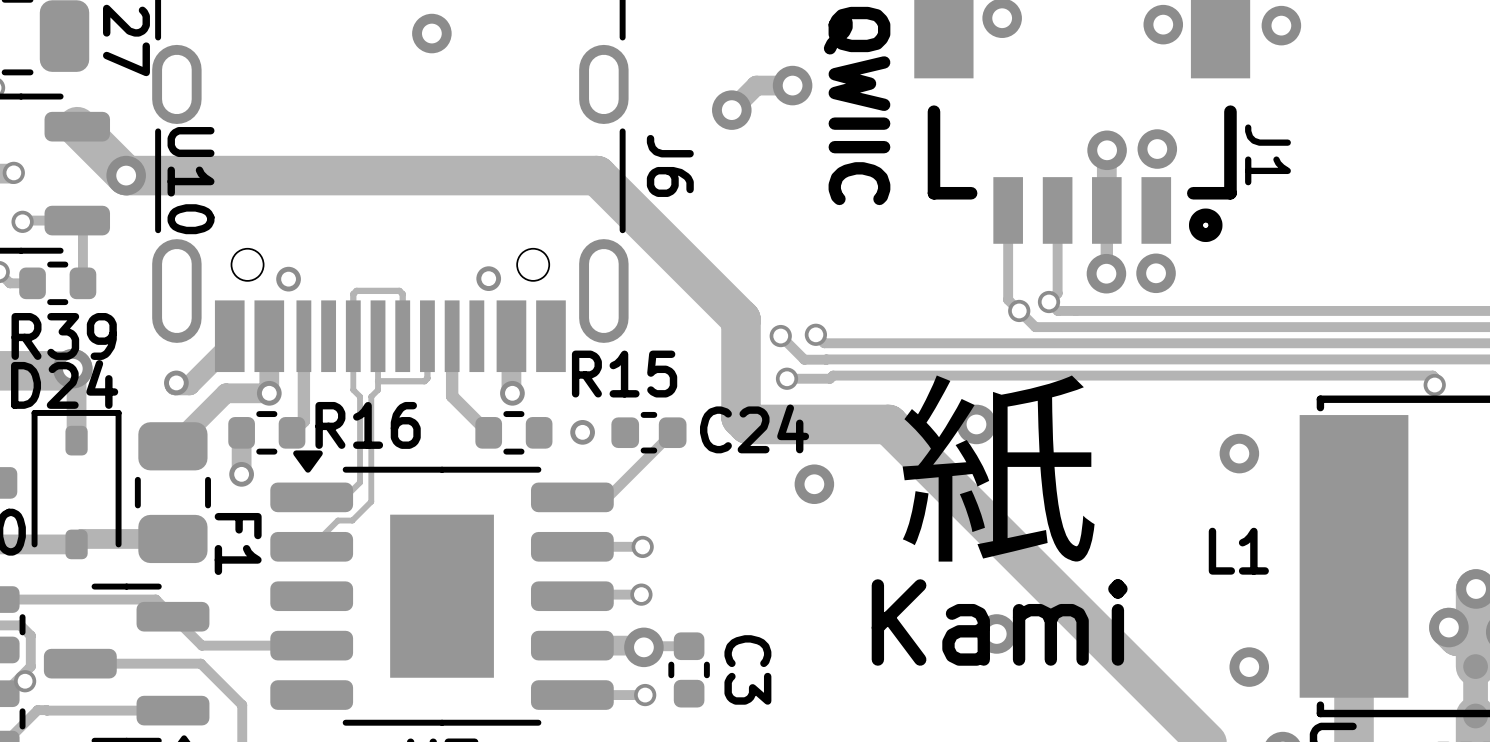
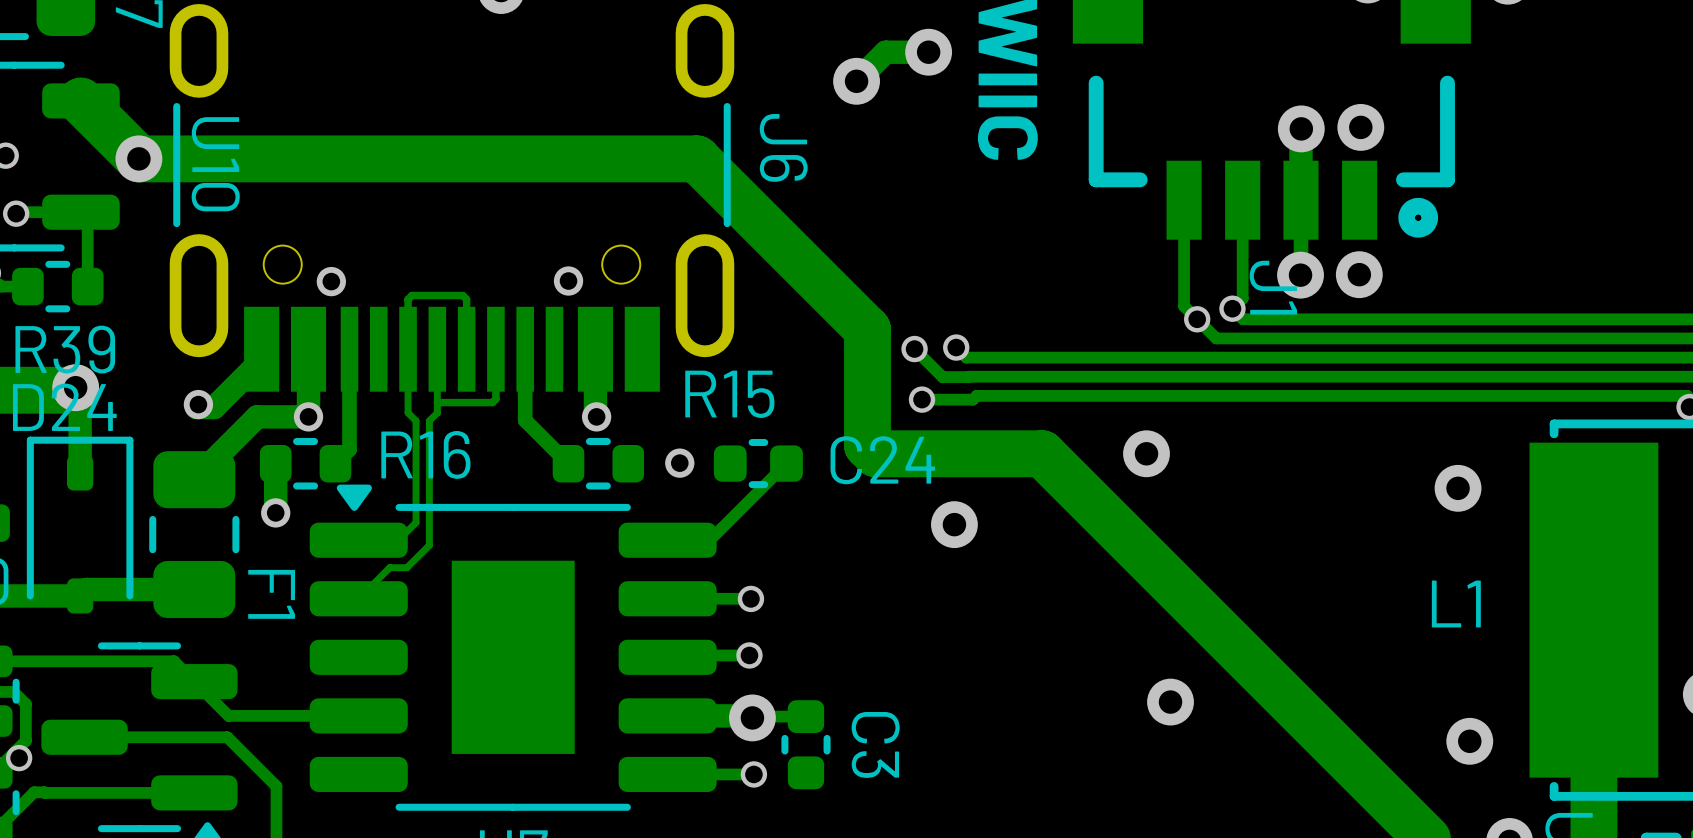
J1 name position: J1 (1267, 154) -> J1 (1273, 287)
text: 紙 (998, 470) -> none
text: Kami (999, 622) -> none

